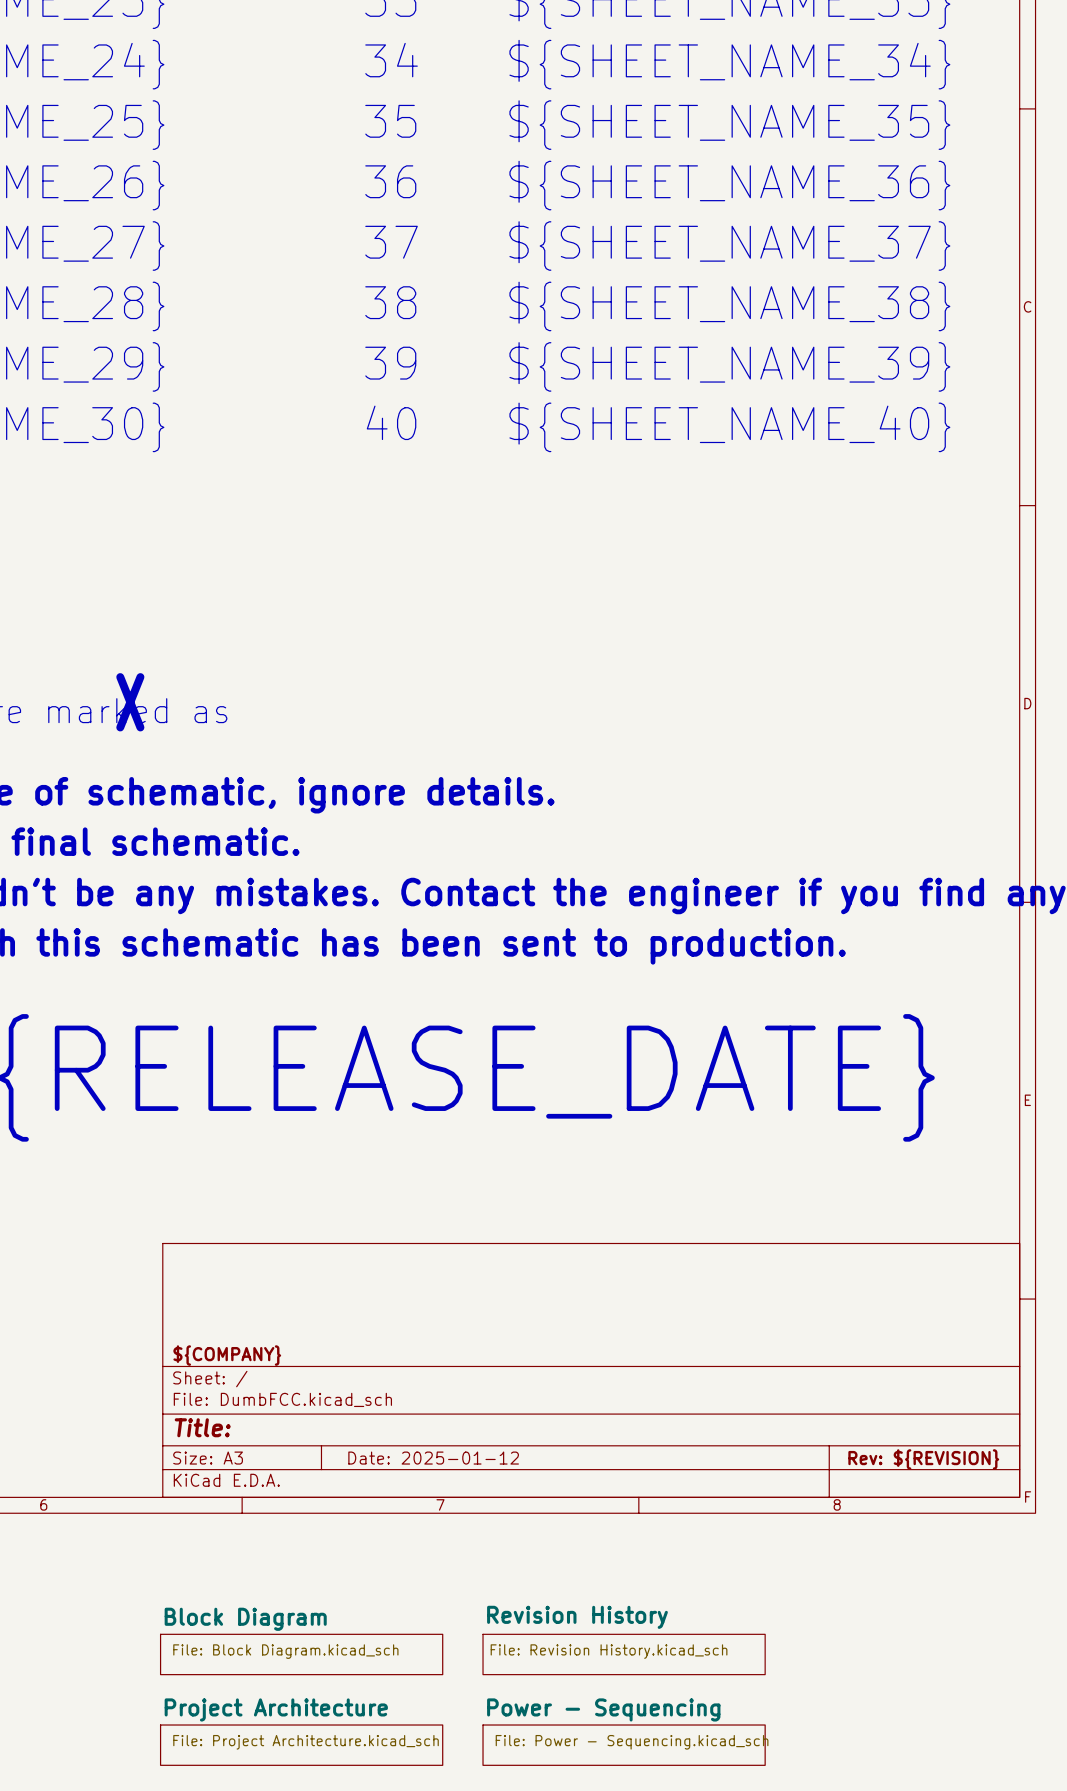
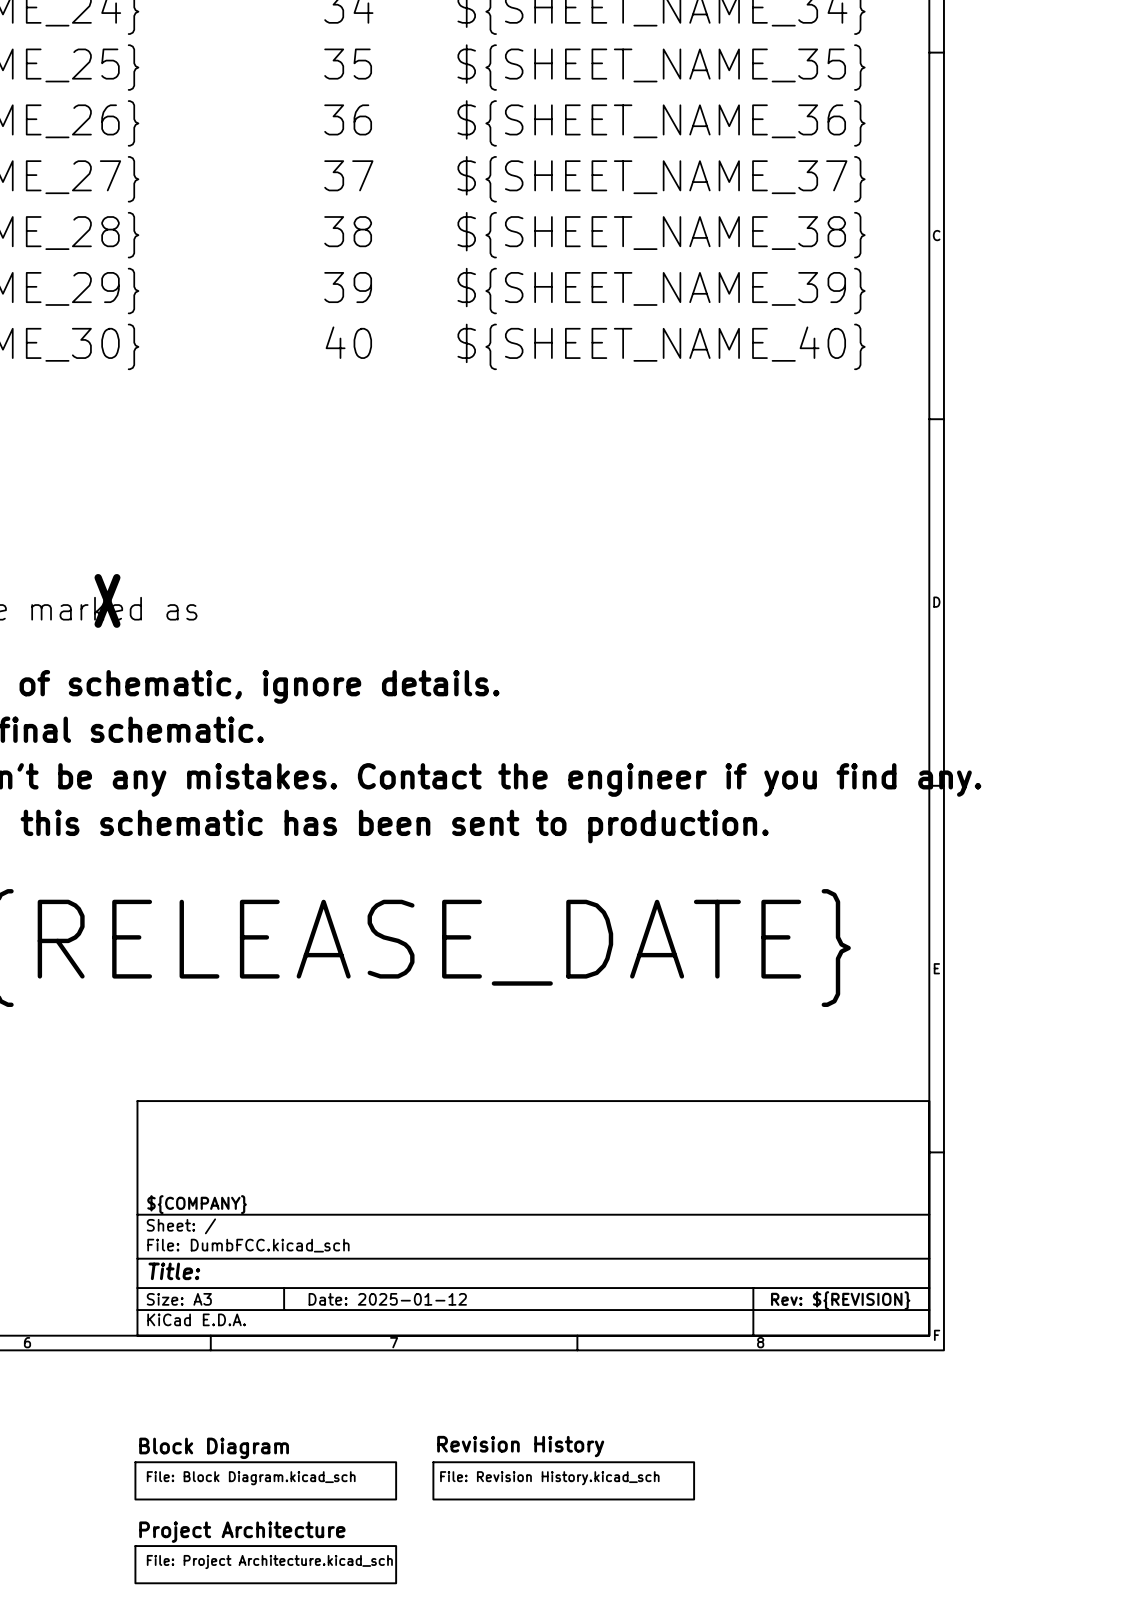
sheet Power - Sequencing: File: Power - Sequencing.kicad_sch (624, 1745) -> none

